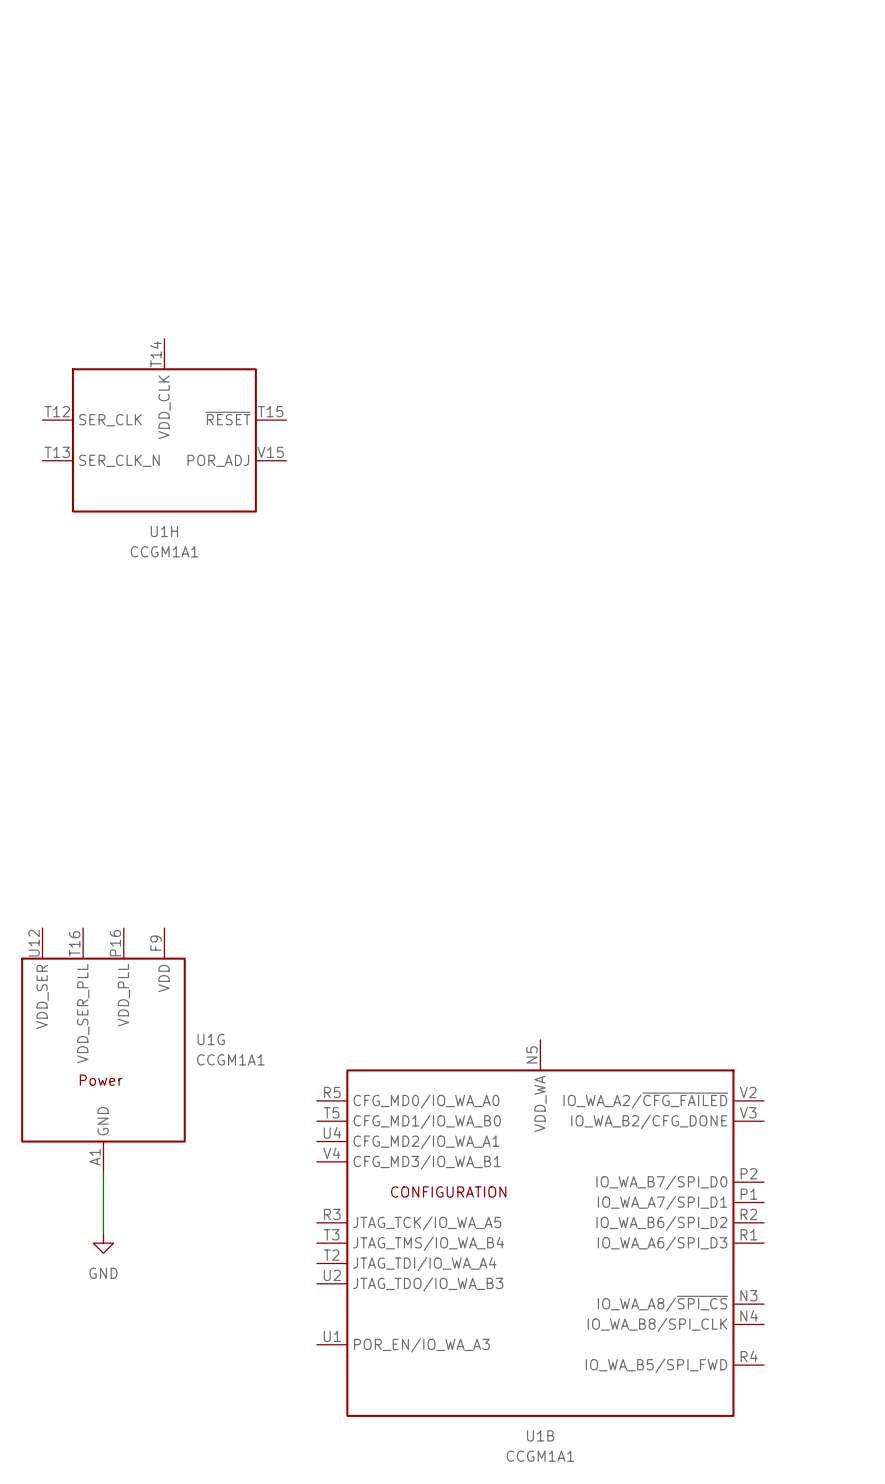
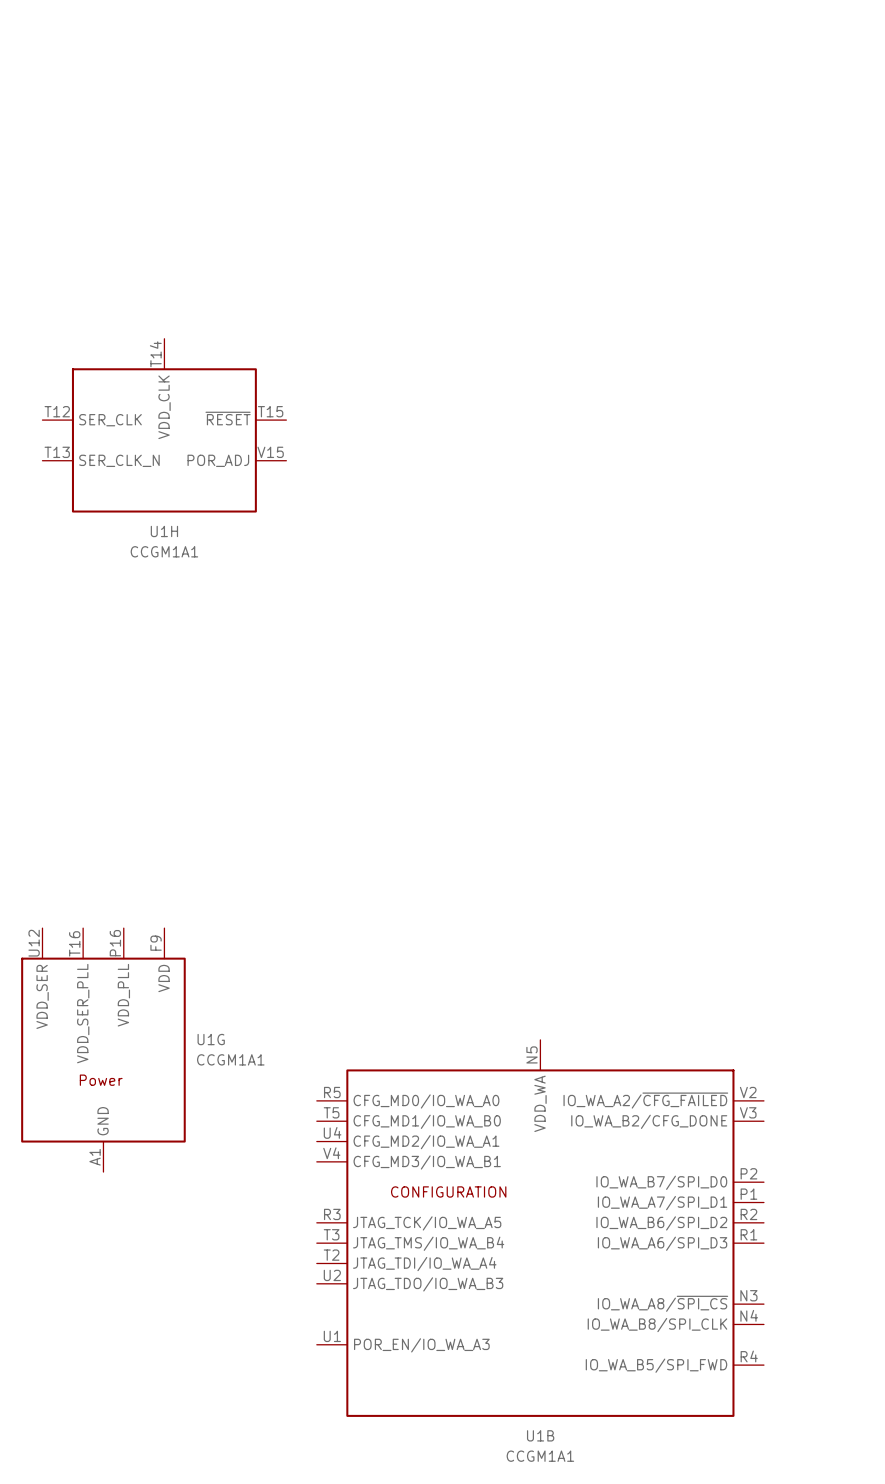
wire: (103, 1172) (103, 1233) -> none
power symbol: GND (103, 1243) -> none

